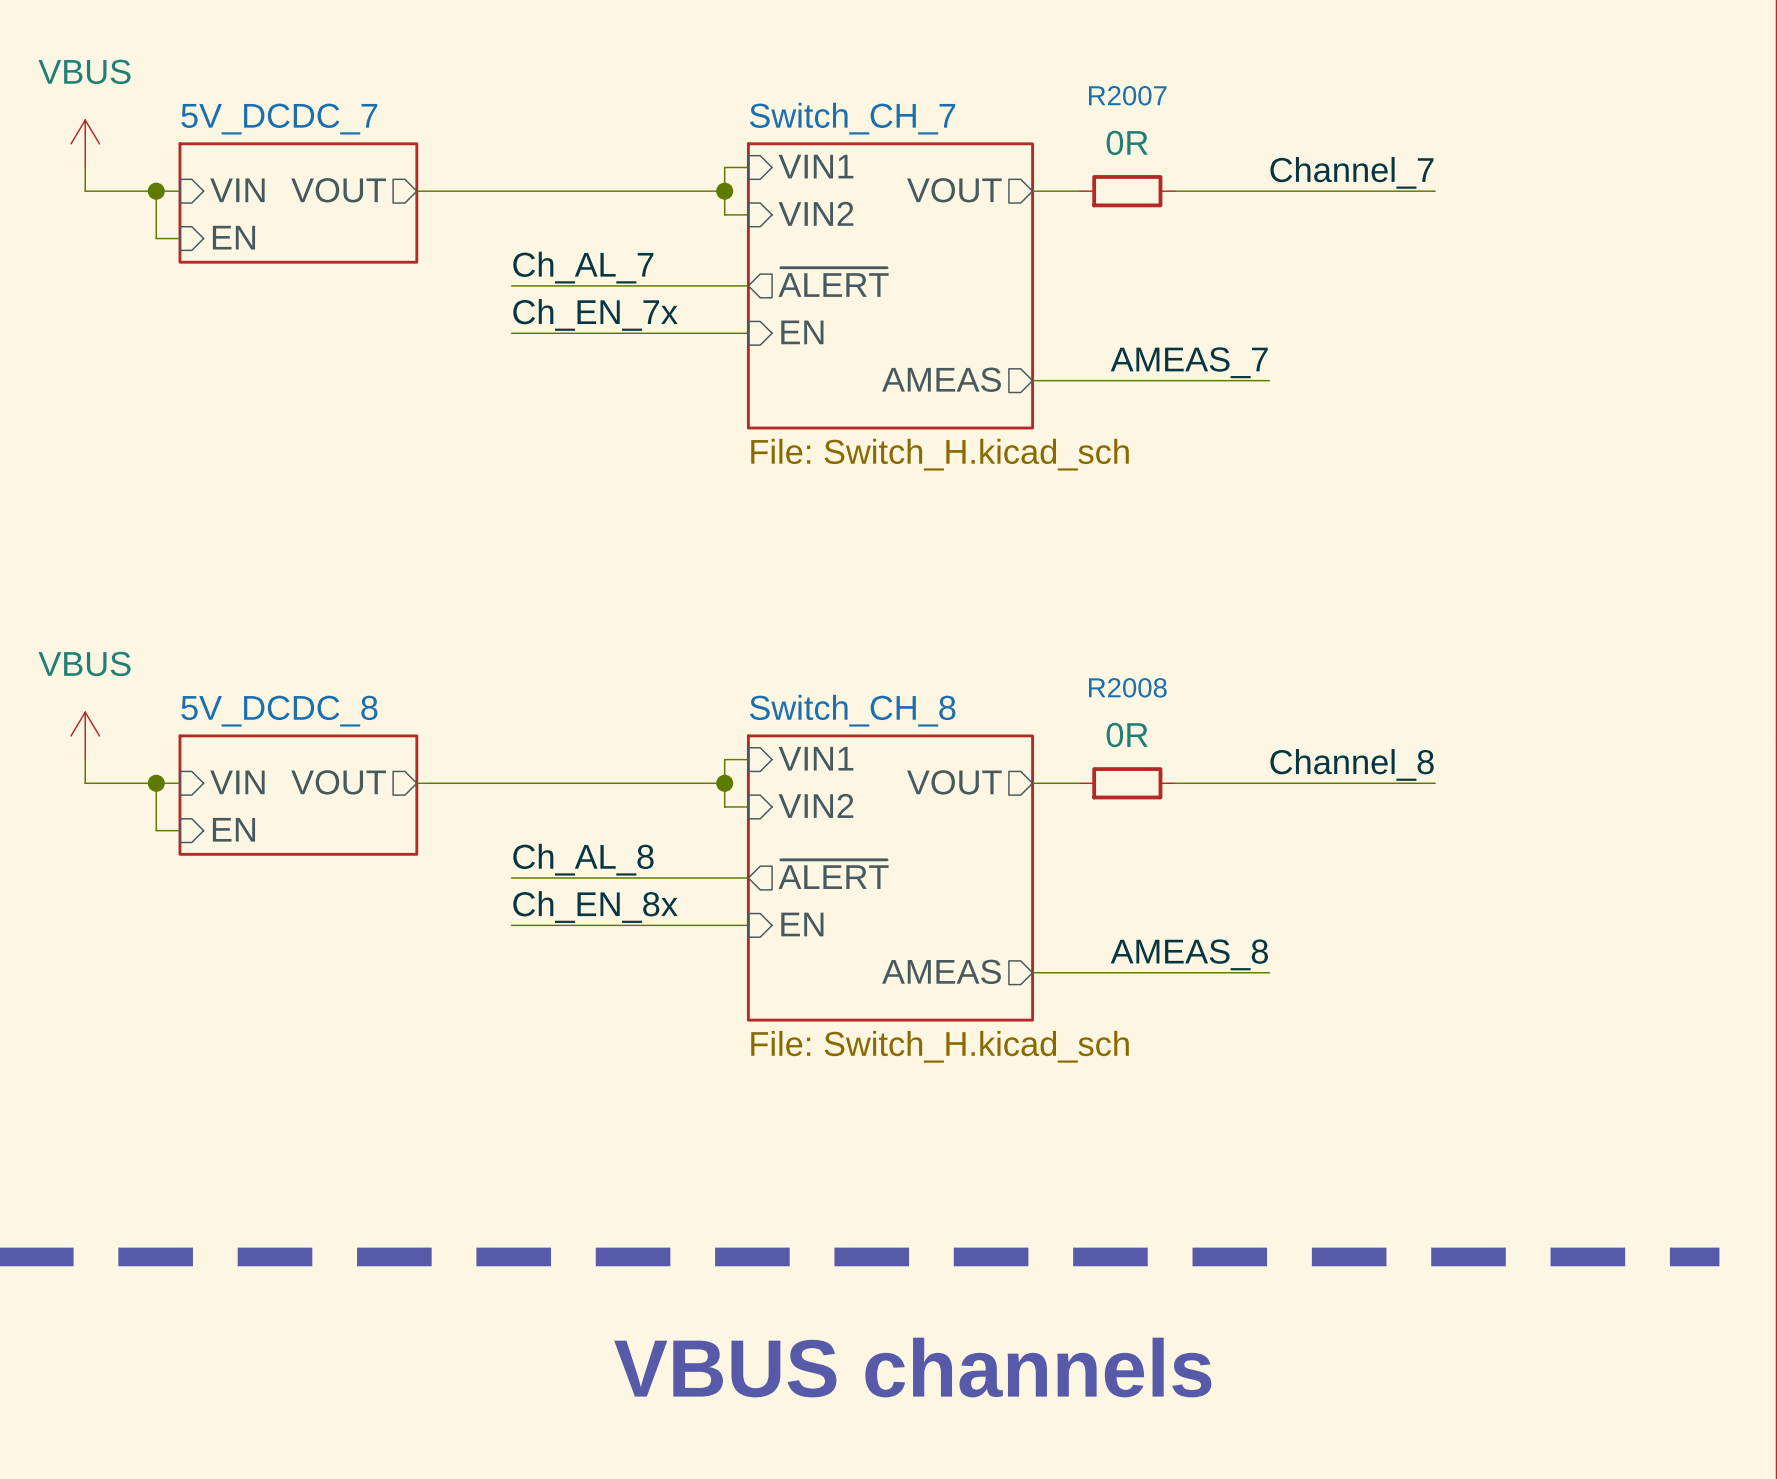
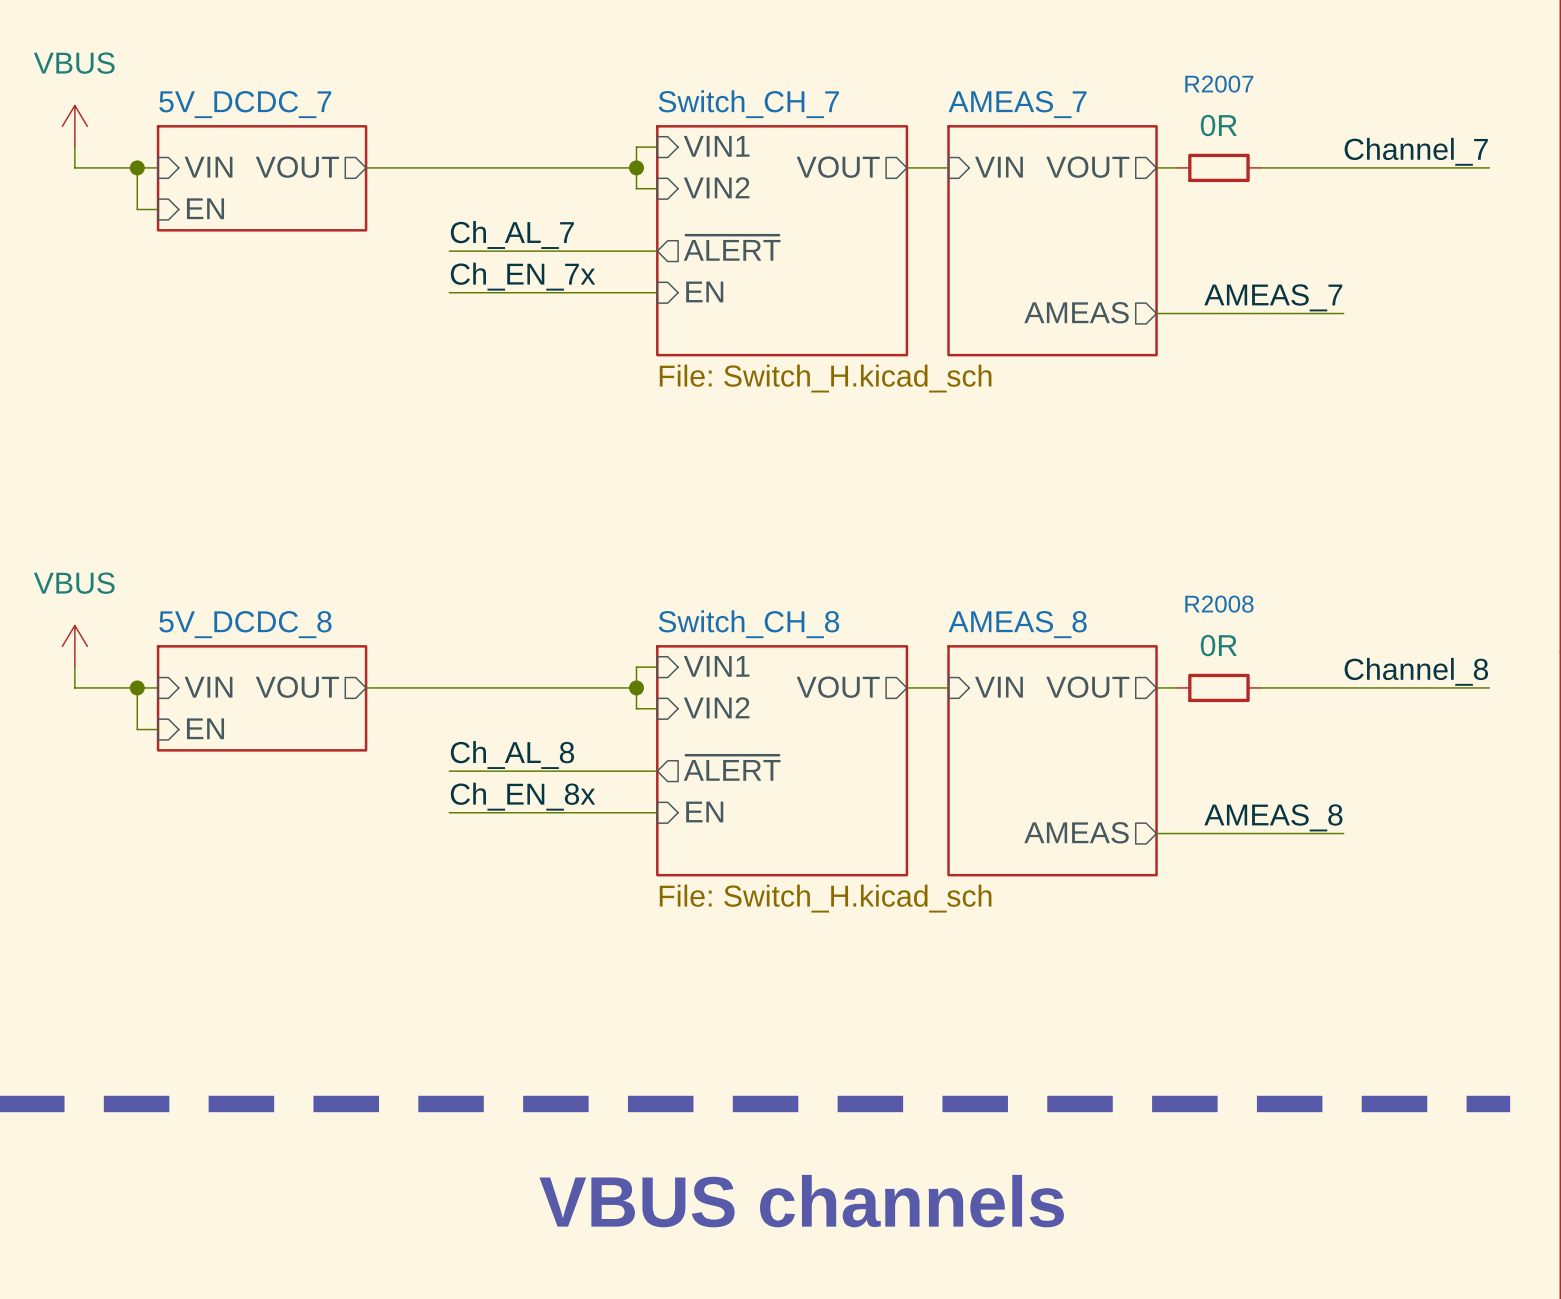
sheet Switch_CH_7 shape: [746, 142, 1035, 430] -> [656, 125, 909, 357]
label position: Channel_7 (1351, 172) -> Channel_7 (1416, 151)
sheet pin: none -> VIN (998, 167)
sheet pin: none -> VOUT (1087, 167)
R2007 position: (1127, 191) -> (1218, 167)
wire: (1174, 191) (1316, 191) -> none
wire: (1340, 191) (1435, 191) -> (1489, 167) (1260, 167)
sheet AMEAS_7: none -> (1052, 240)
wire: none -> (1156, 313) (1343, 313)
label position: AMEAS_7 (1189, 362) -> AMEAS_7 (1273, 297)
sheet pin position: AMEAS (941, 379) -> AMEAS (1076, 312)
wire: (1032, 380) (1269, 380) -> none
sheet Switch_CH_8 shape: [746, 734, 1035, 1022] -> [656, 645, 909, 877]
label position: Channel_8 (1352, 764) -> Channel_8 (1416, 671)
sheet pin: none -> VIN (998, 687)
sheet pin: none -> VOUT (1087, 687)
R2008 position: (1127, 783) -> (1218, 687)
wire: (1174, 783) (1316, 783) -> none
wire: (1340, 783) (1435, 783) -> (1489, 687) (1260, 687)
sheet AMEAS_8: none -> (1052, 760)
wire: none -> (1156, 833) (1343, 833)
label position: AMEAS_8 (1189, 954) -> AMEAS_8 (1273, 817)
sheet pin position: AMEAS (941, 971) -> AMEAS (1076, 832)
wire: (1032, 972) (1269, 972) -> none

